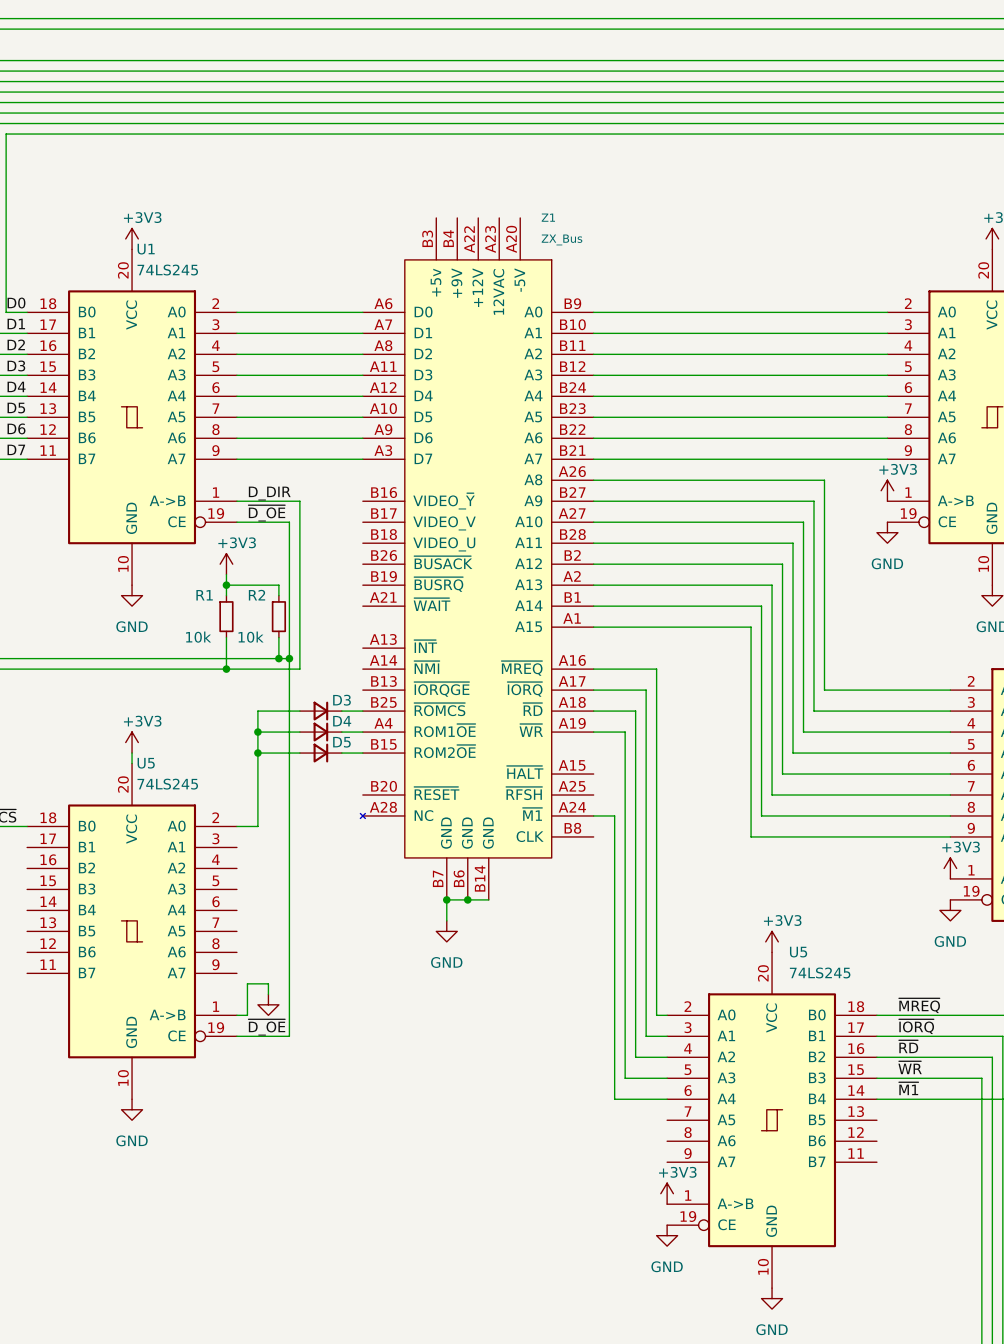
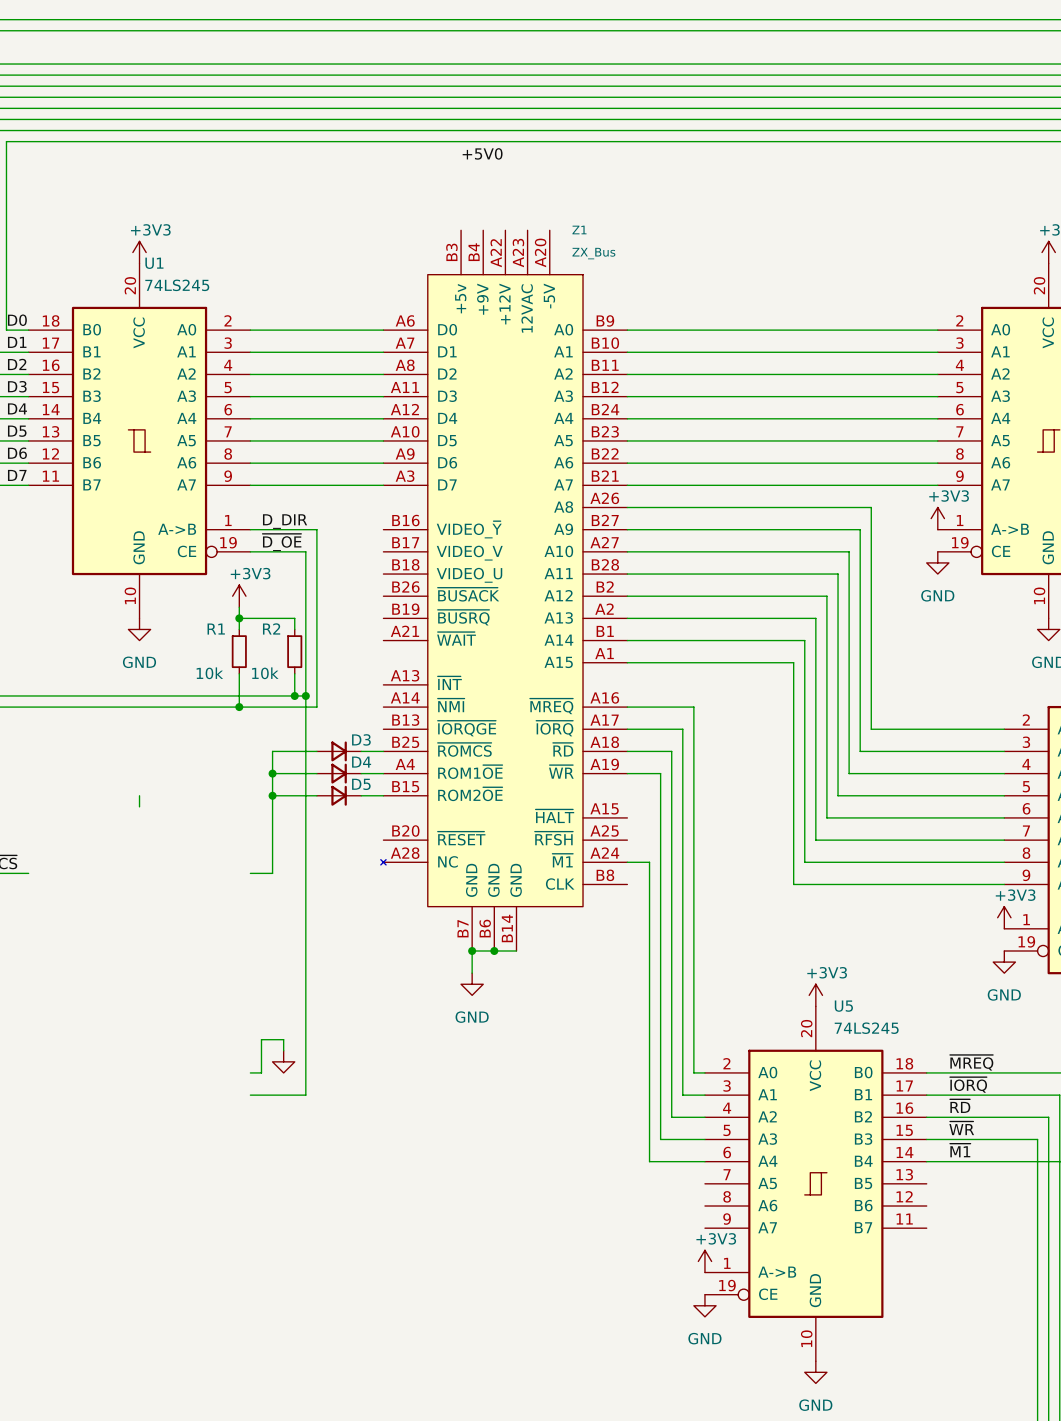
label: none -> +5V0 (482, 153)
power symbol: +3V3 (132, 742) -> none
U5: 74LS245 (132, 931) -> none
label: ~{D_OE} (266, 1027) -> none
power symbol: GND (132, 1109) -> none

